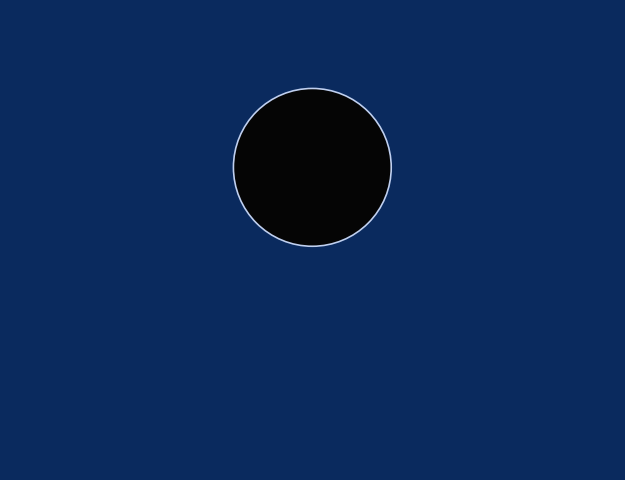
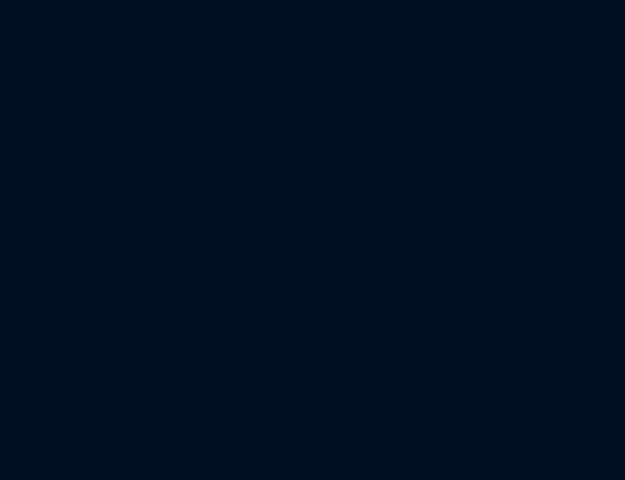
part: (312, 167) -> none

